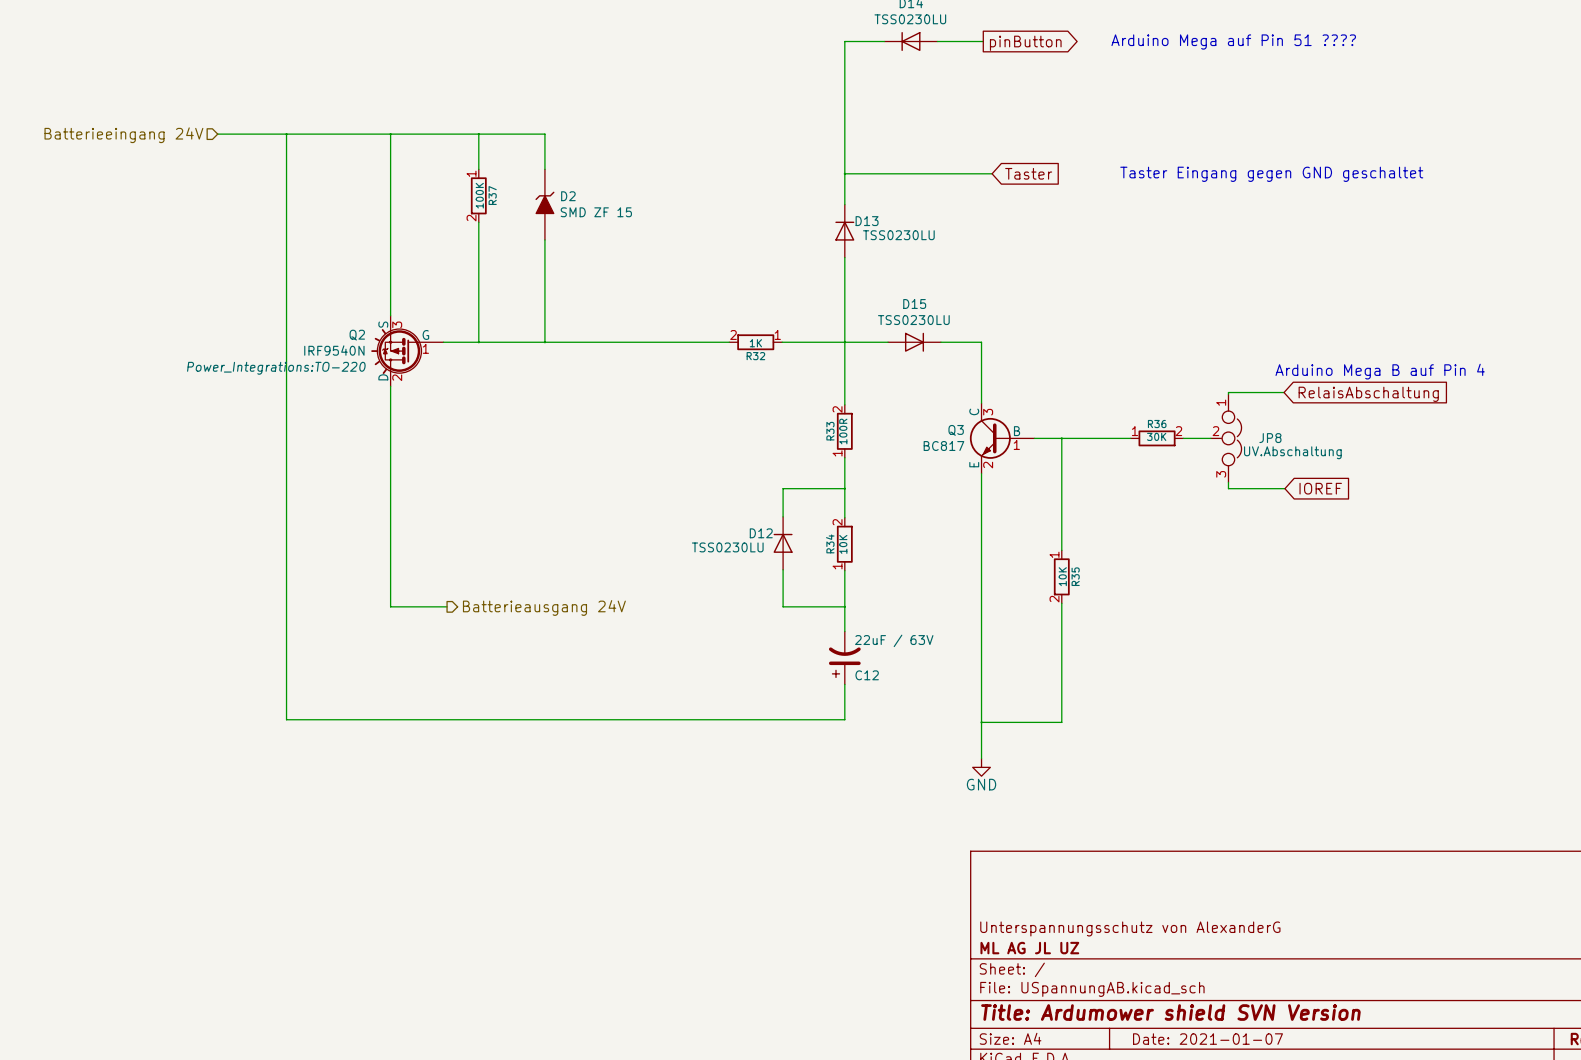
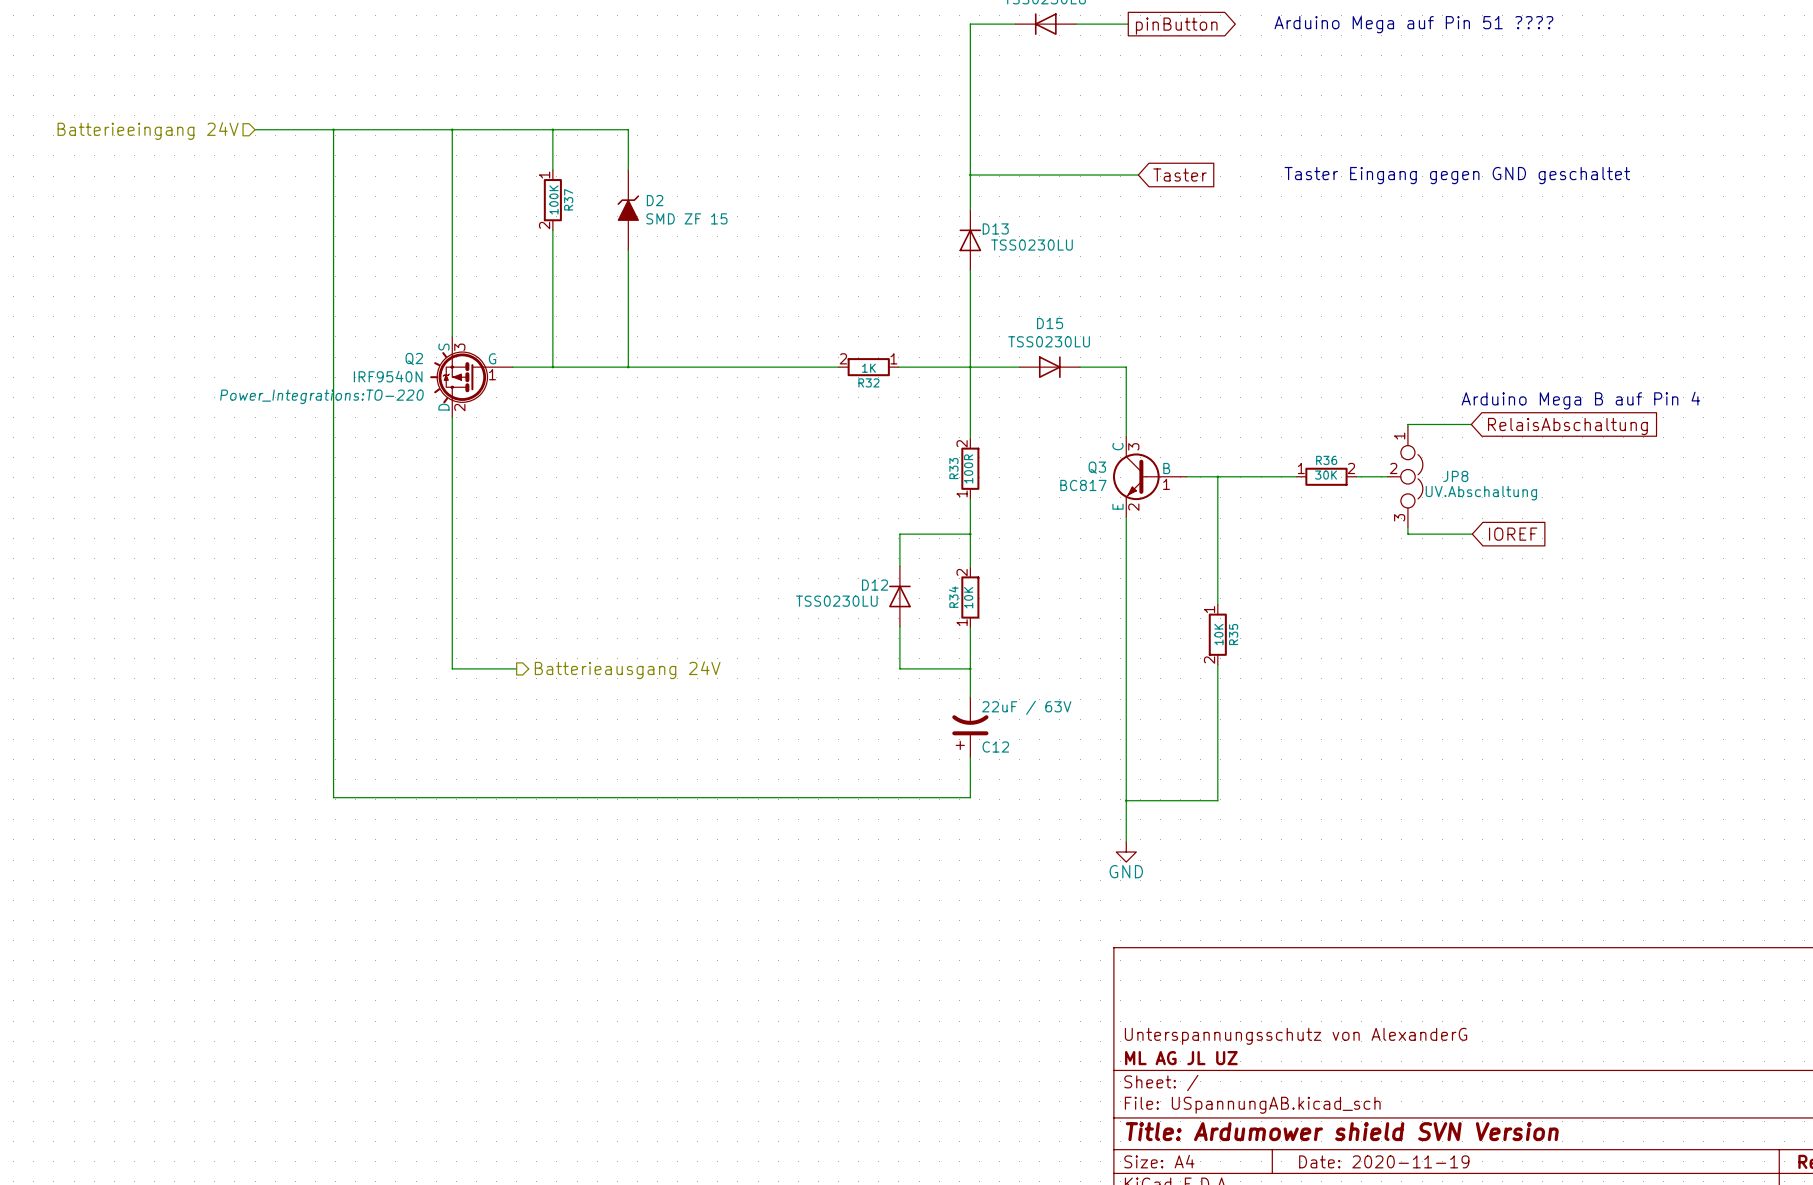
title block: Date: 2021-01-07 (1207, 1039) -> Date: 2020-11-19 (1384, 1161)

